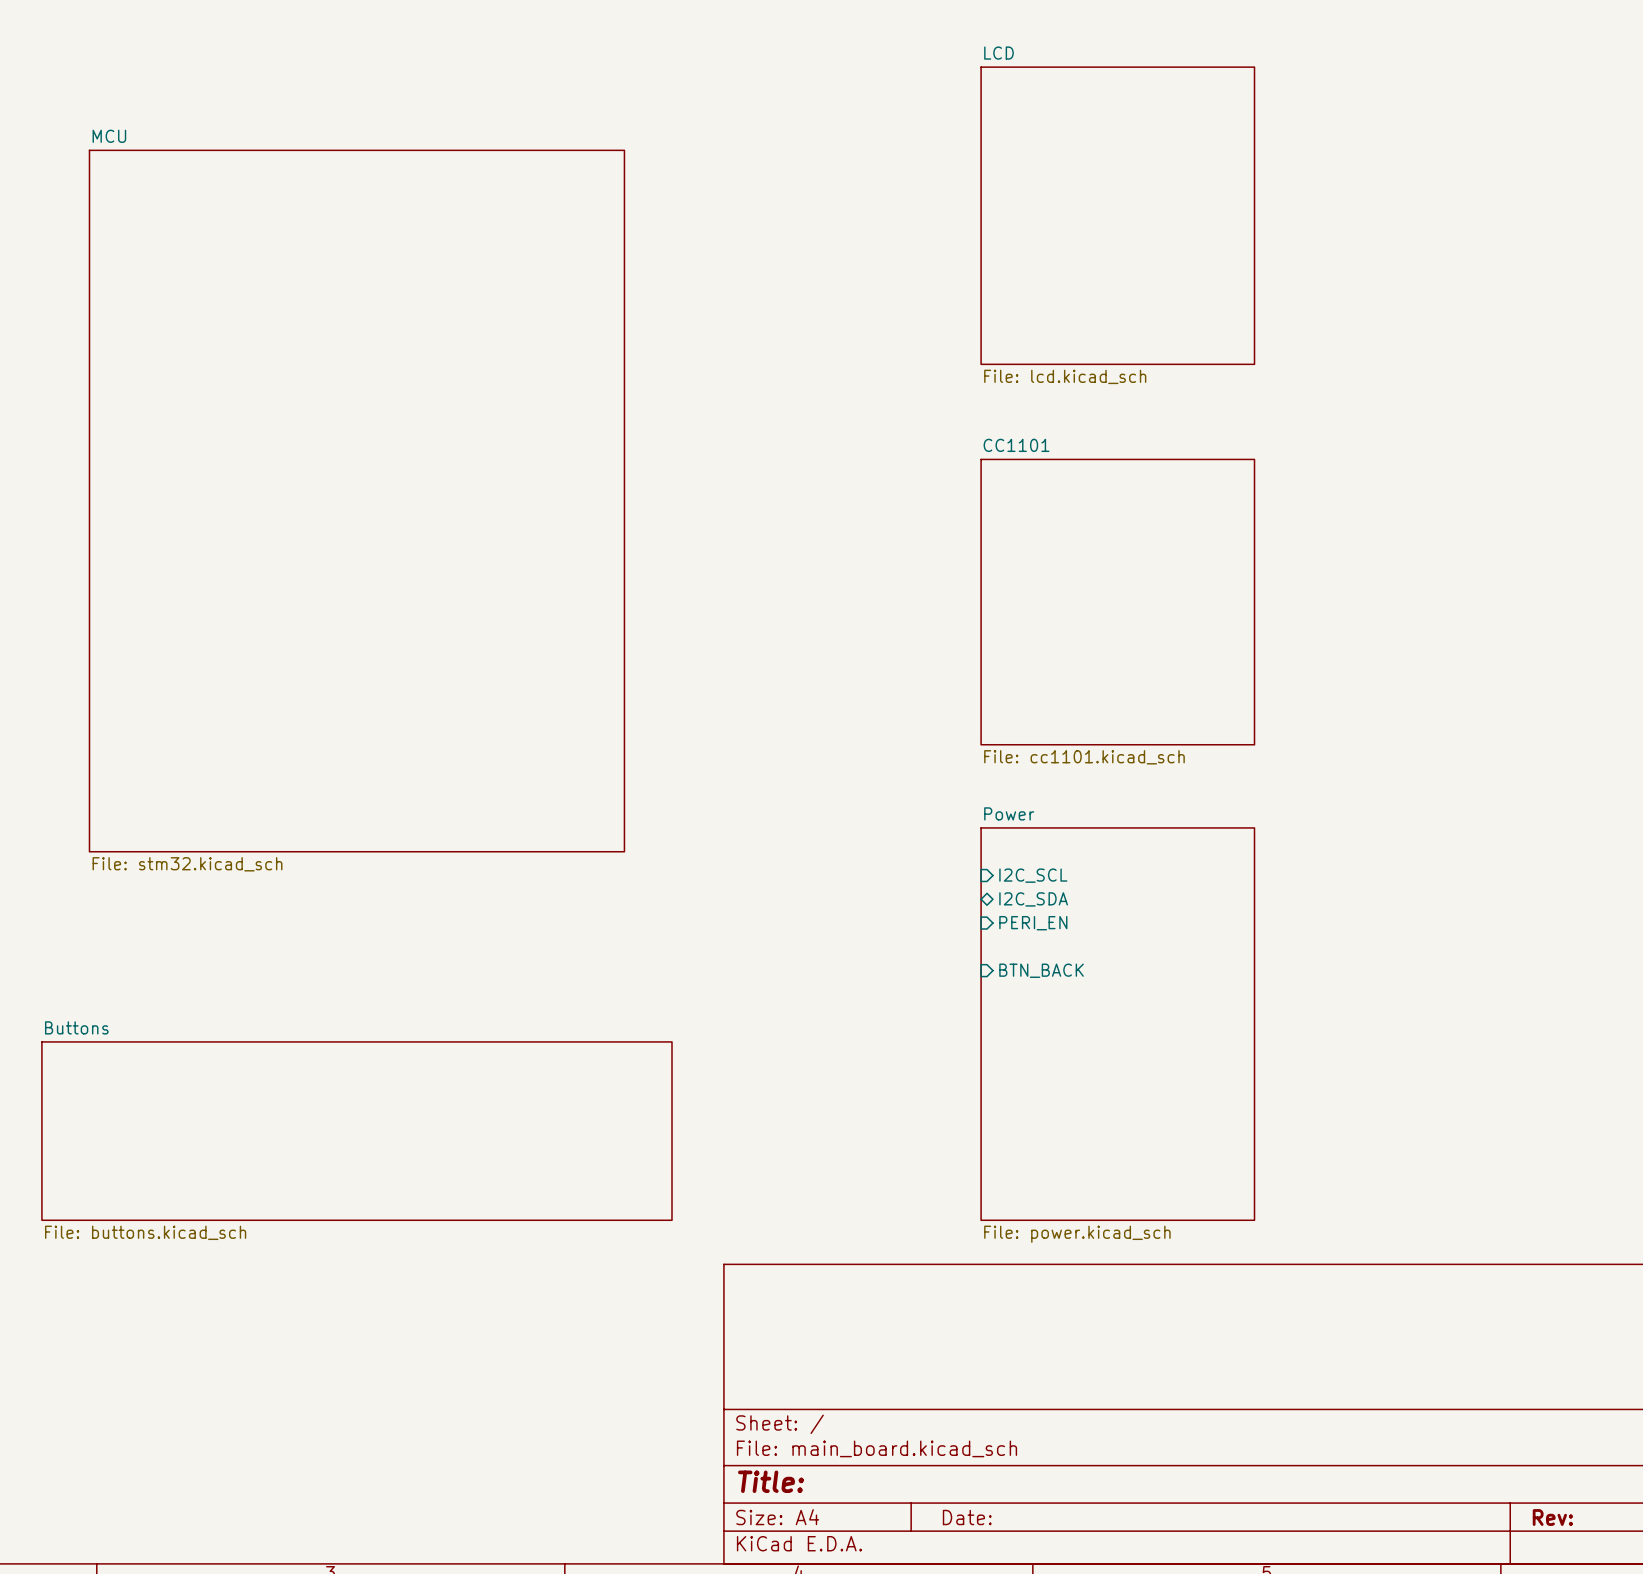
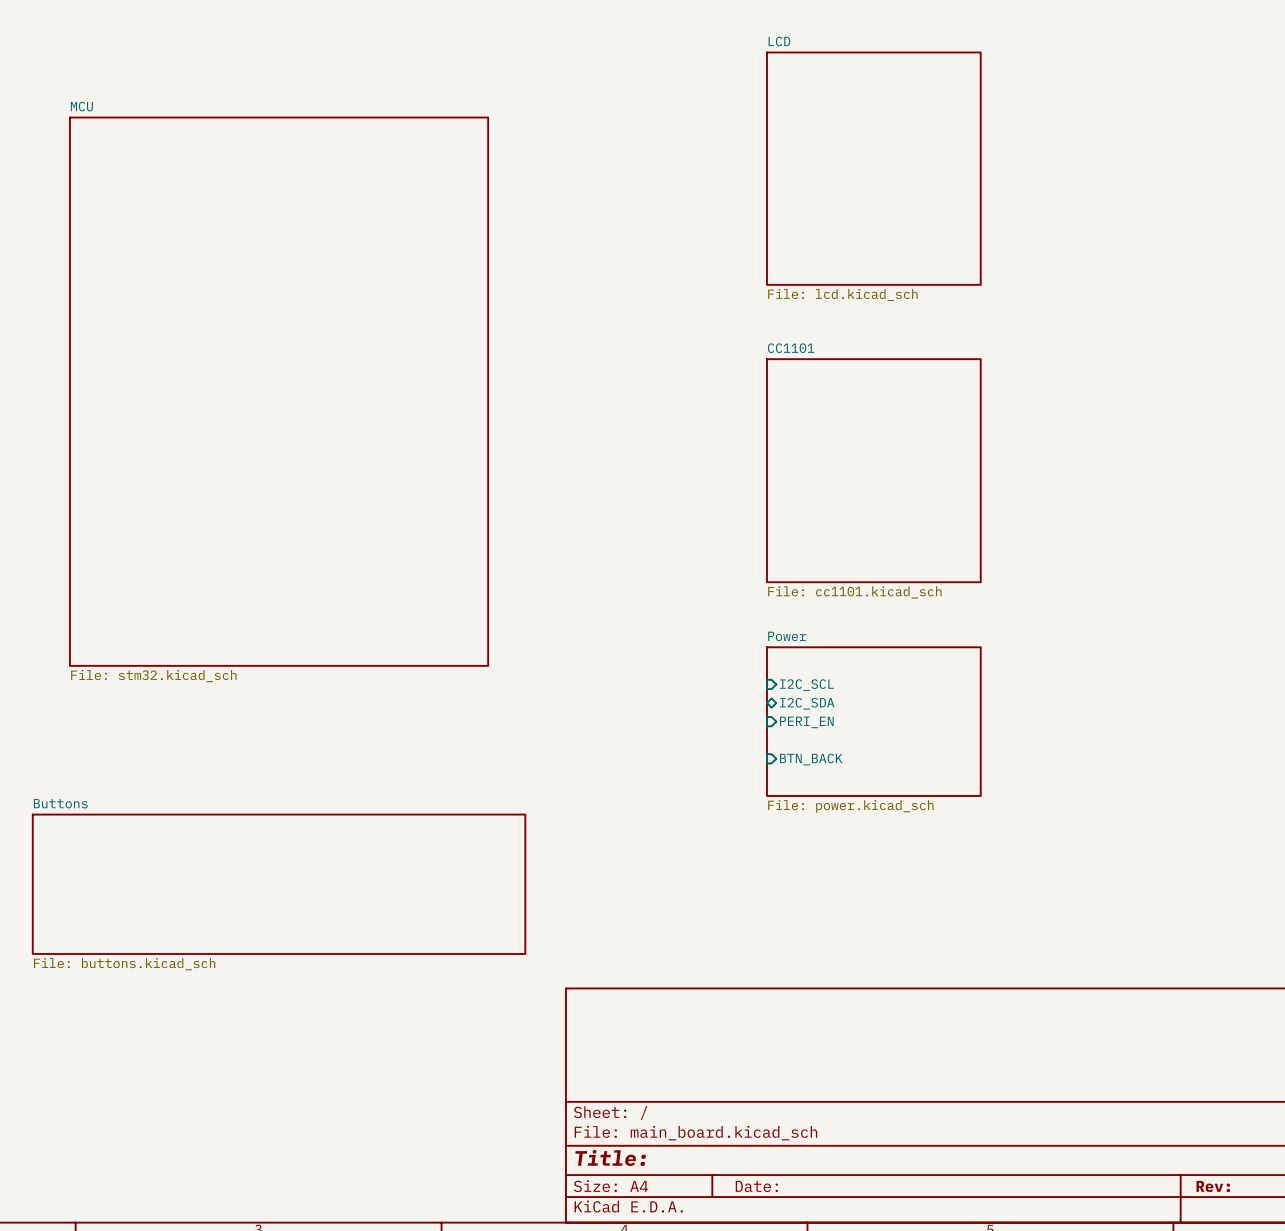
sheet Power: none -> File: power.kicad_sch (873, 721)
sheet Power: File: power.kicad_sch (1117, 1024) -> none

